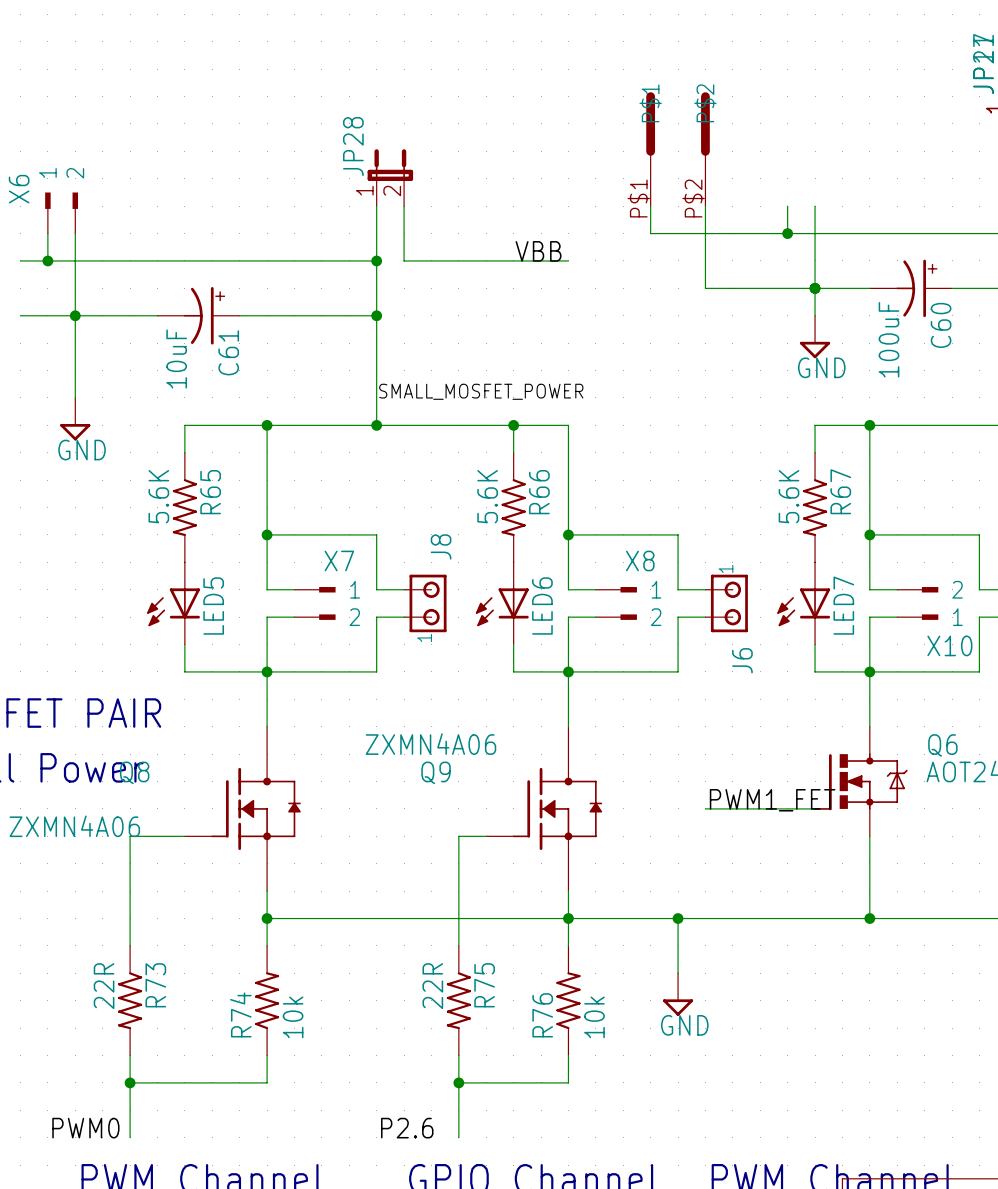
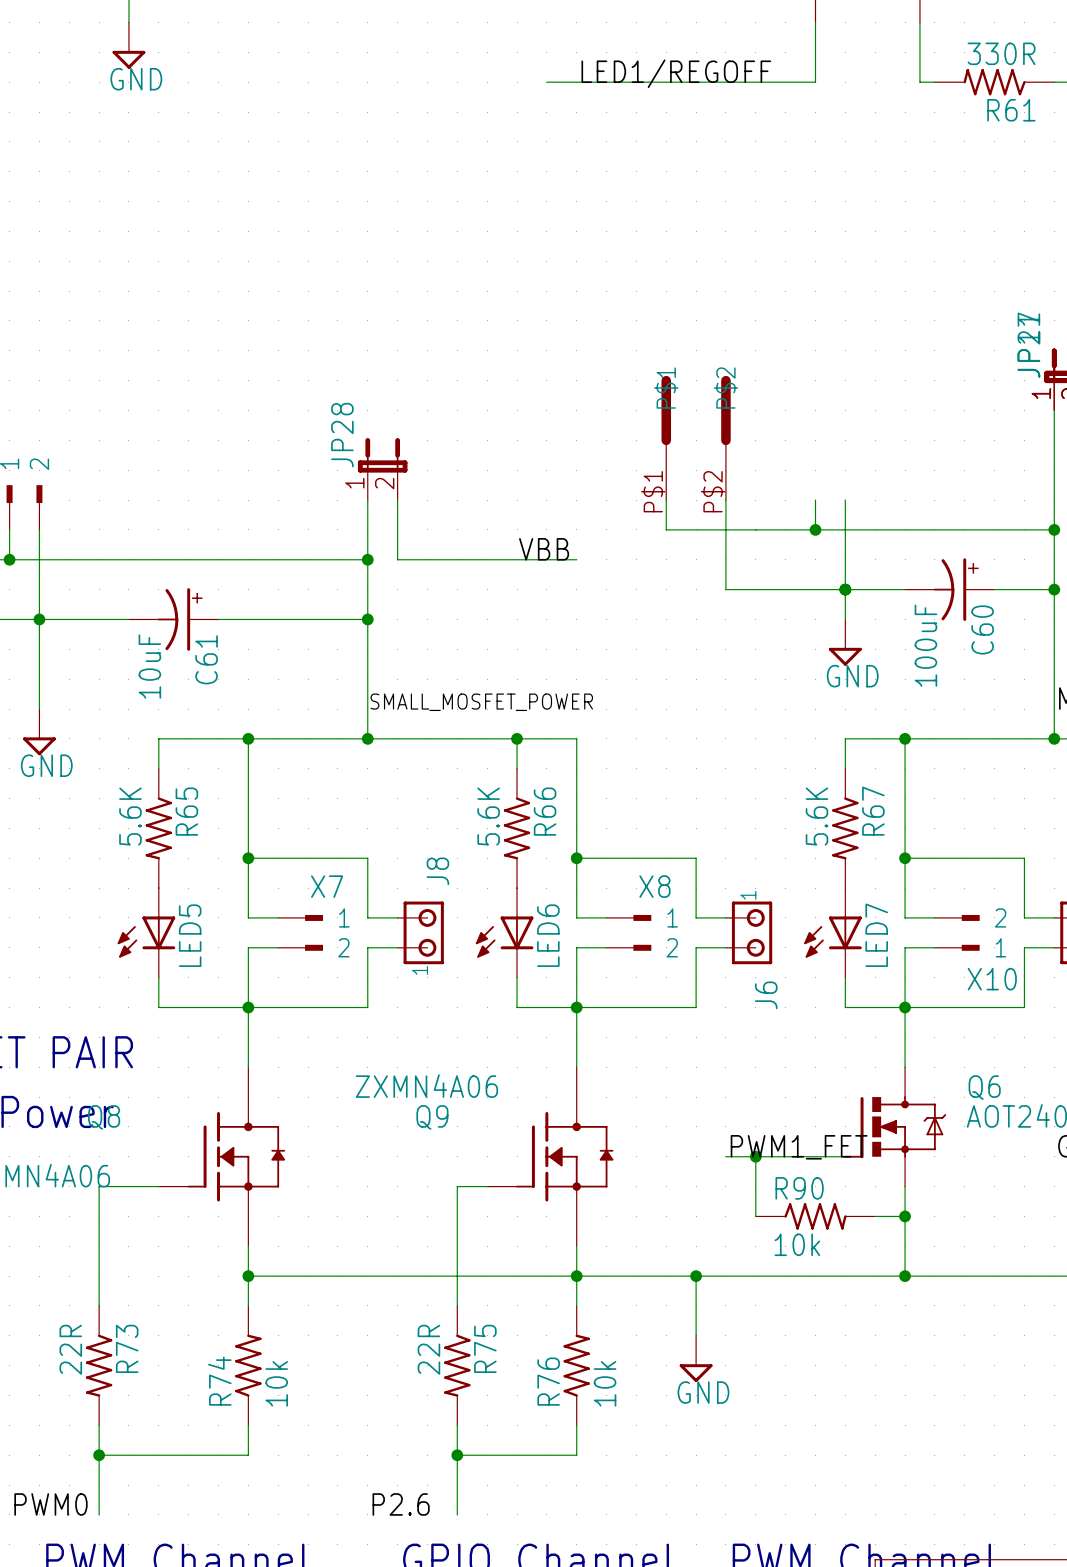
wire: none -> (755, 1156) (755, 1216)
junction: none -> (755, 1156)
R90: none -> 10k (815, 1216)
wire: none -> (875, 1216) (905, 1216)
junction: none -> (905, 1216)

